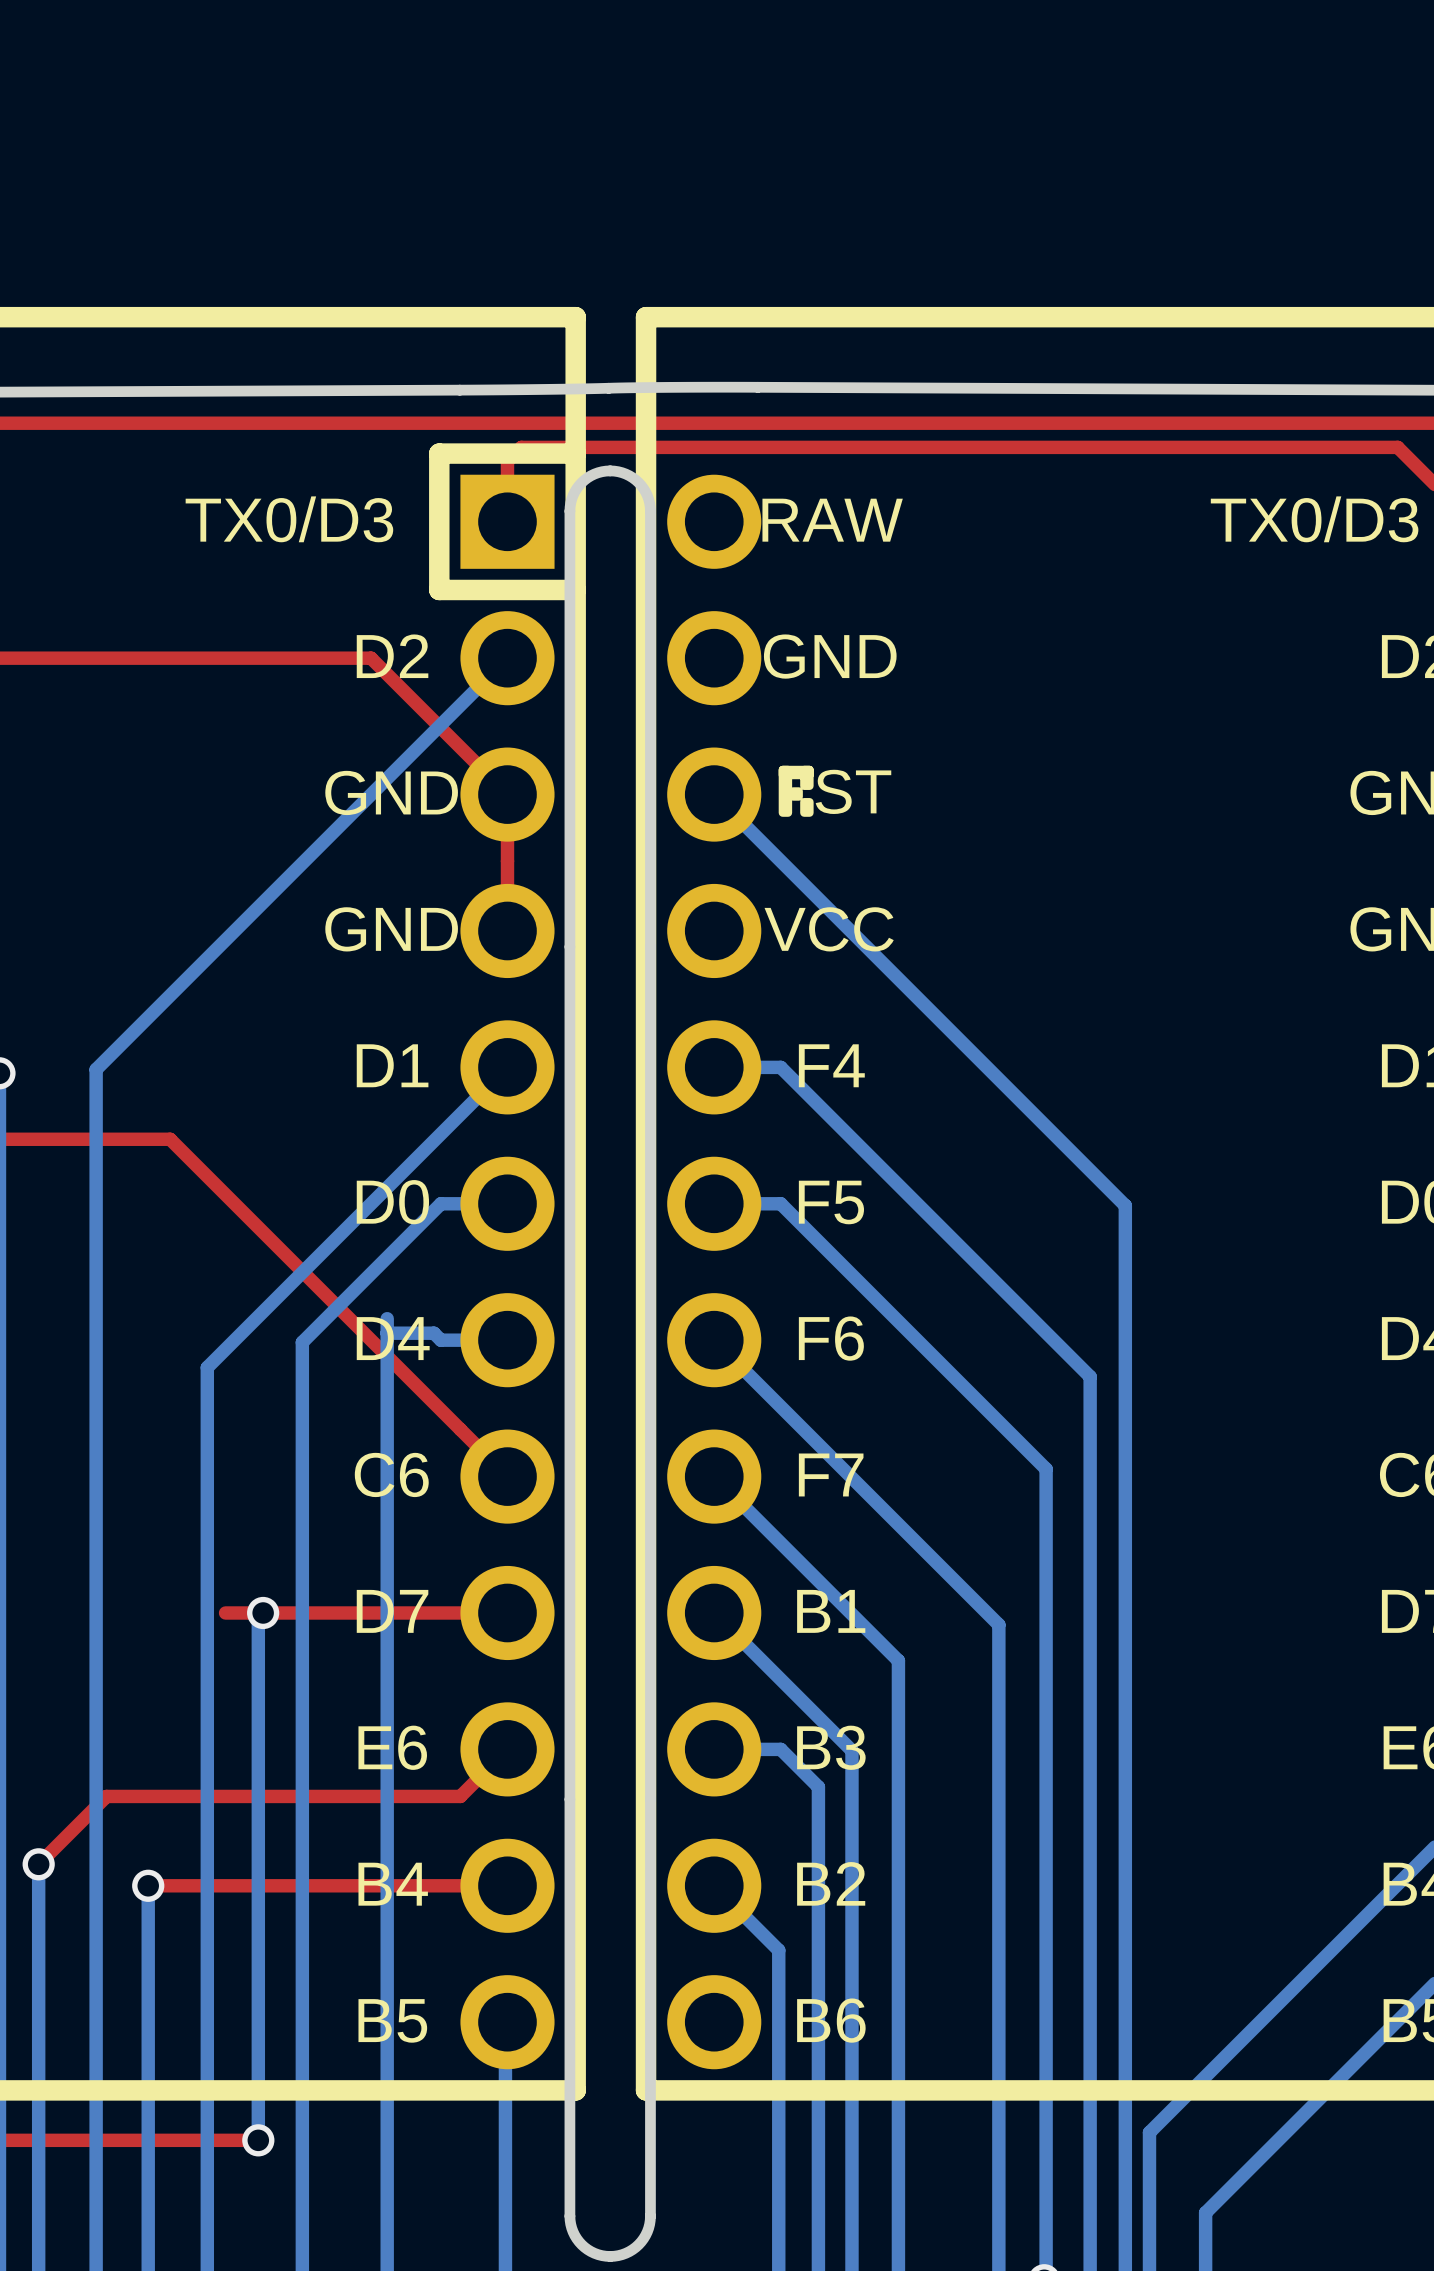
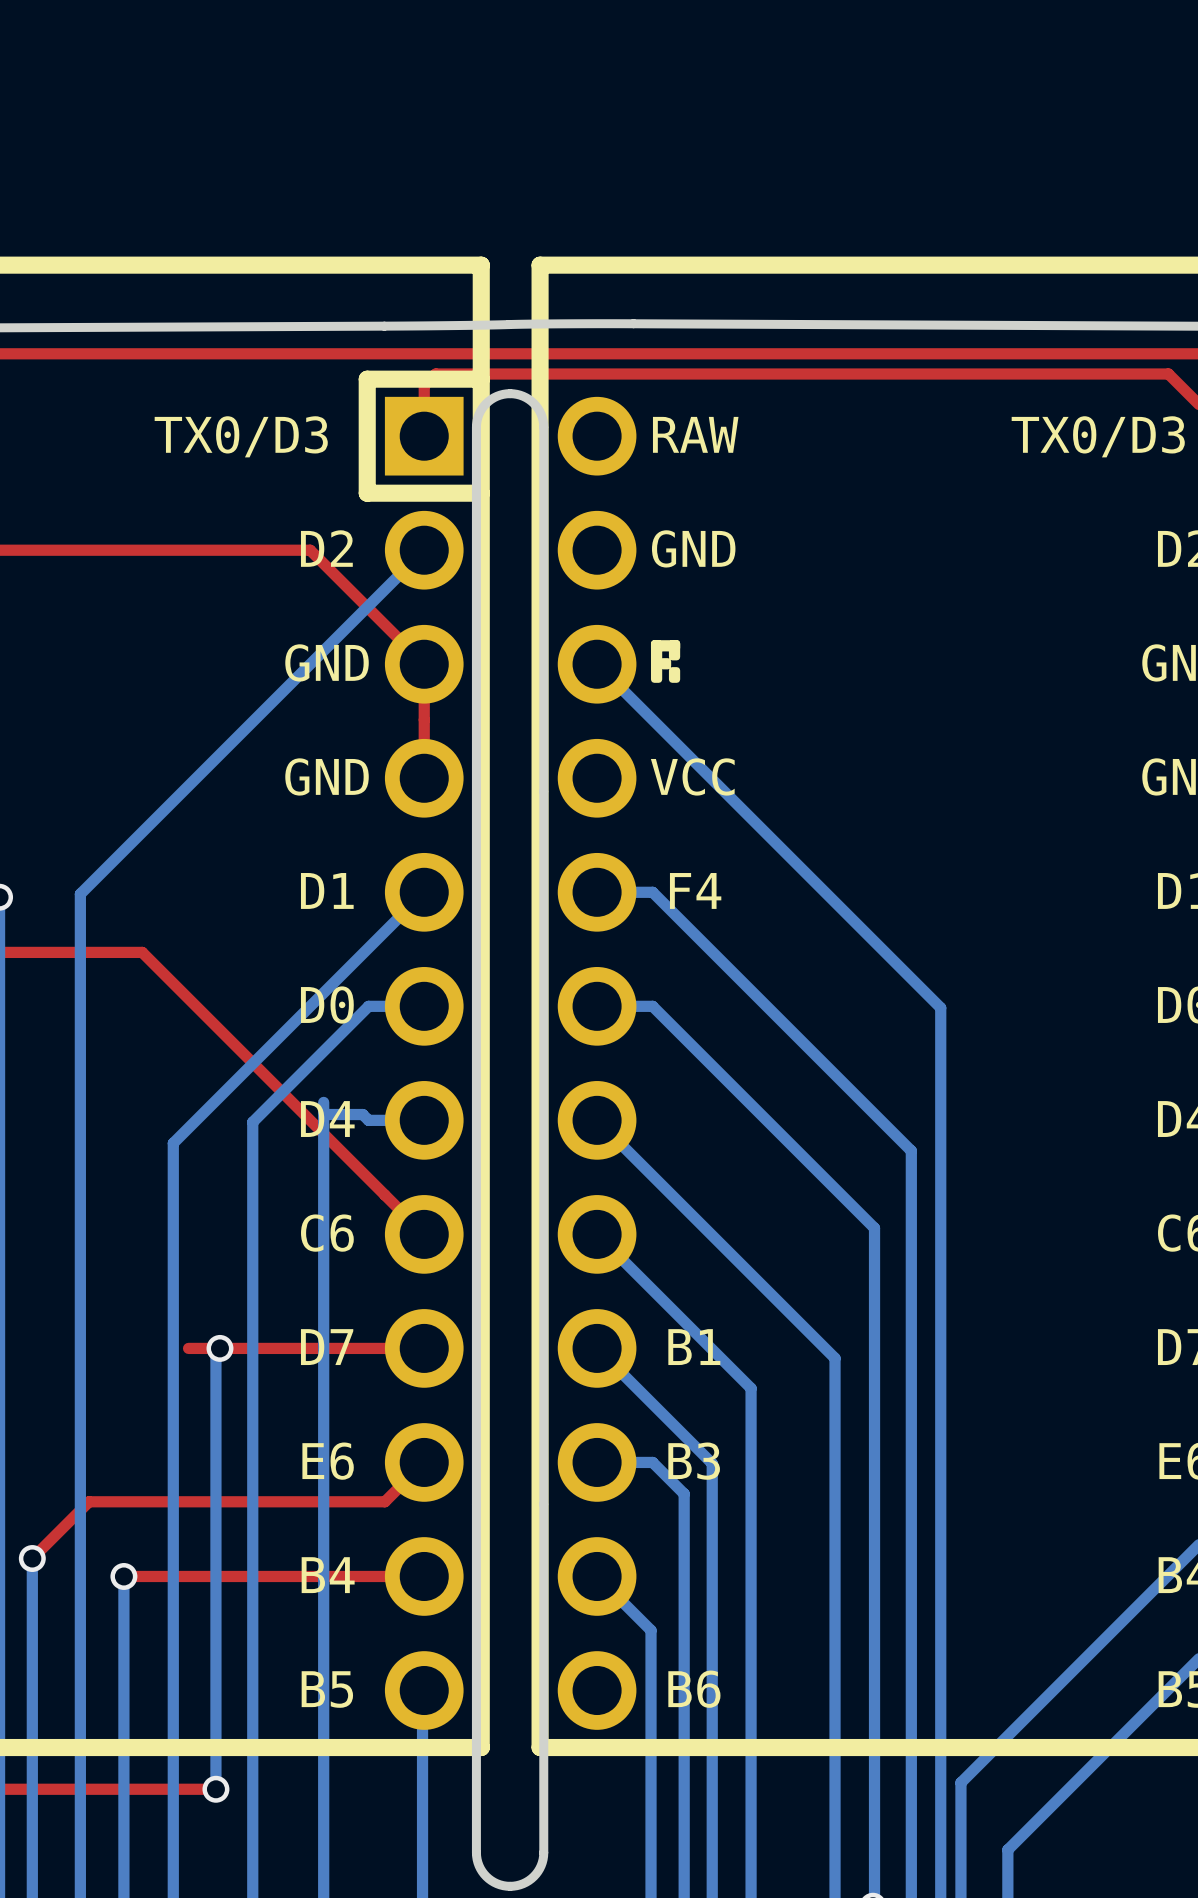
part text: ST (853, 791) -> none
part text: F5 (831, 1202) -> none
part text: F6 (831, 1338) -> none
part text: F7 (831, 1474) -> none
part text: B2 (831, 1883) -> none

